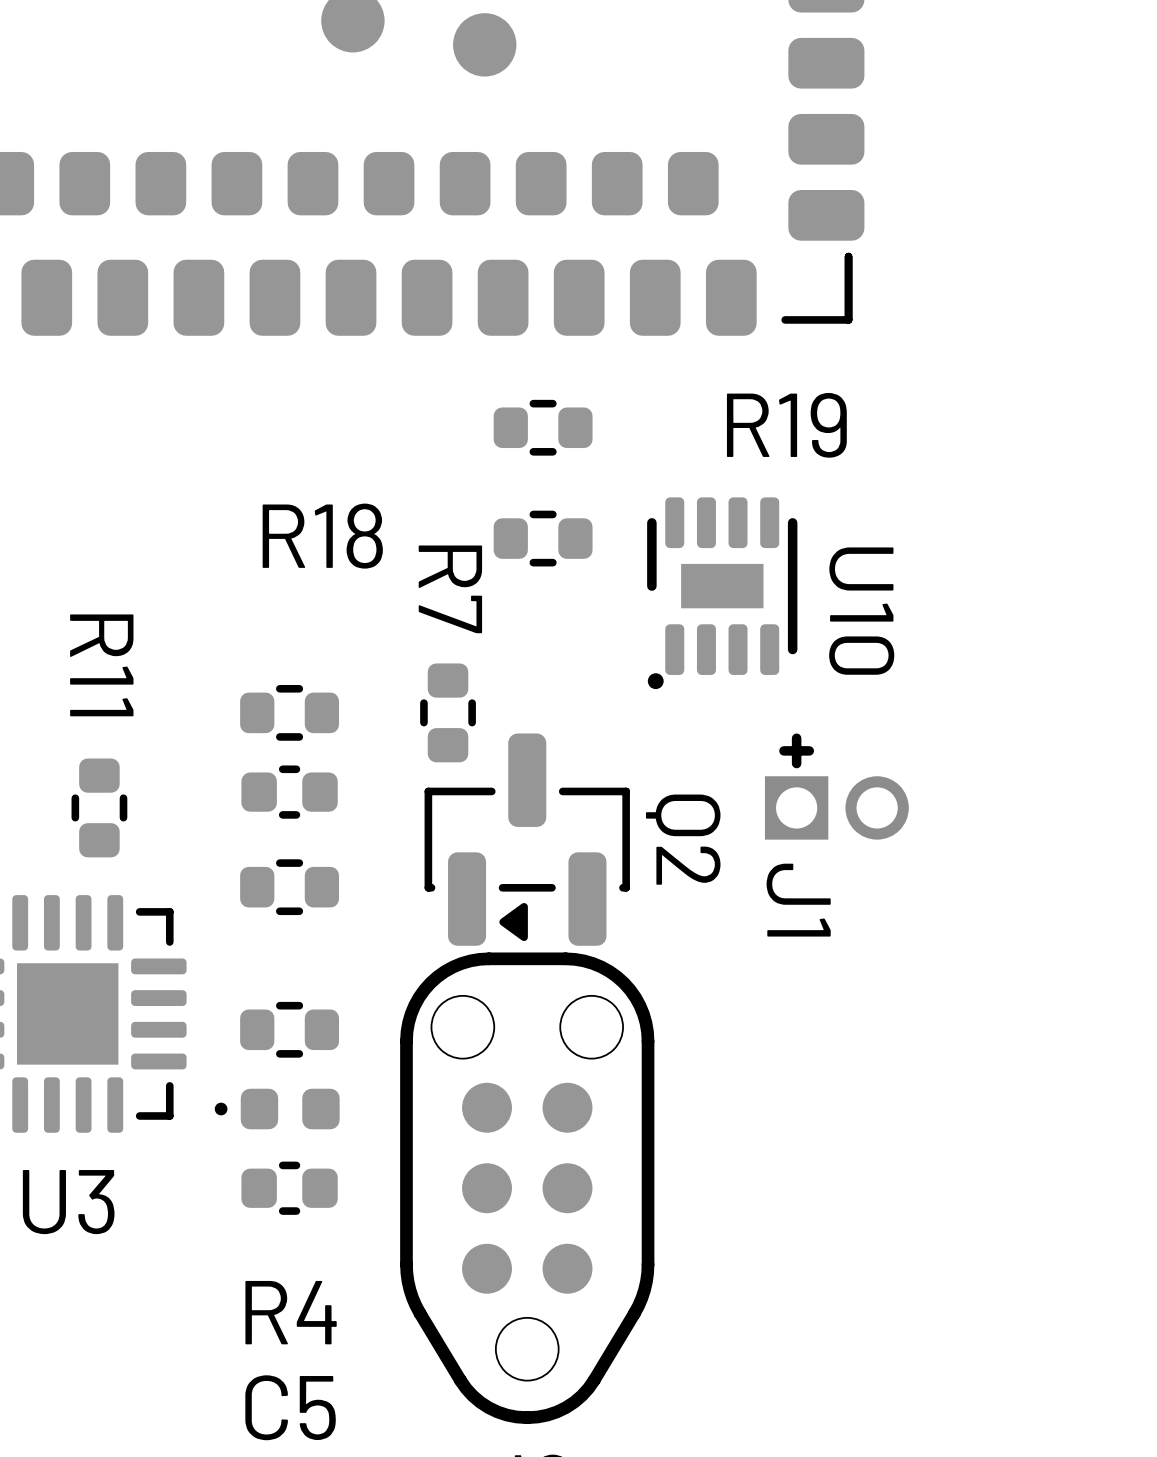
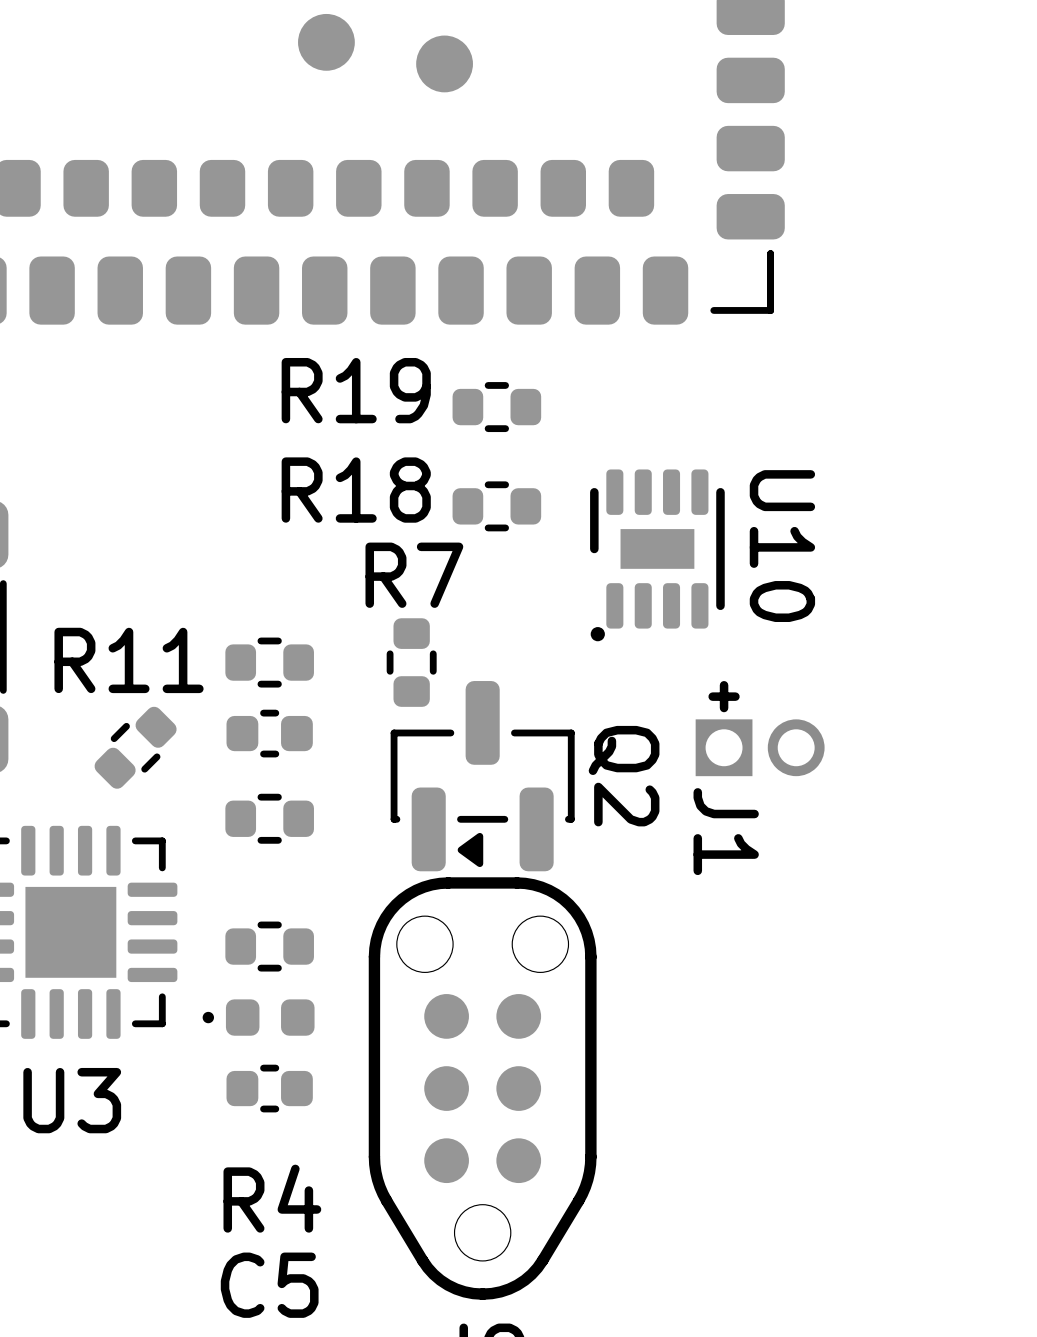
R19 name position: R19 (786, 425) -> R19 (356, 390)
R18 name position: R18 (322, 536) -> R18 (356, 490)
R7 name rotation: 0° (450, 589) -> 90° counterclockwise (414, 575)
R11 rotation: 0° (99, 807) -> 45° clockwise (135, 747)

